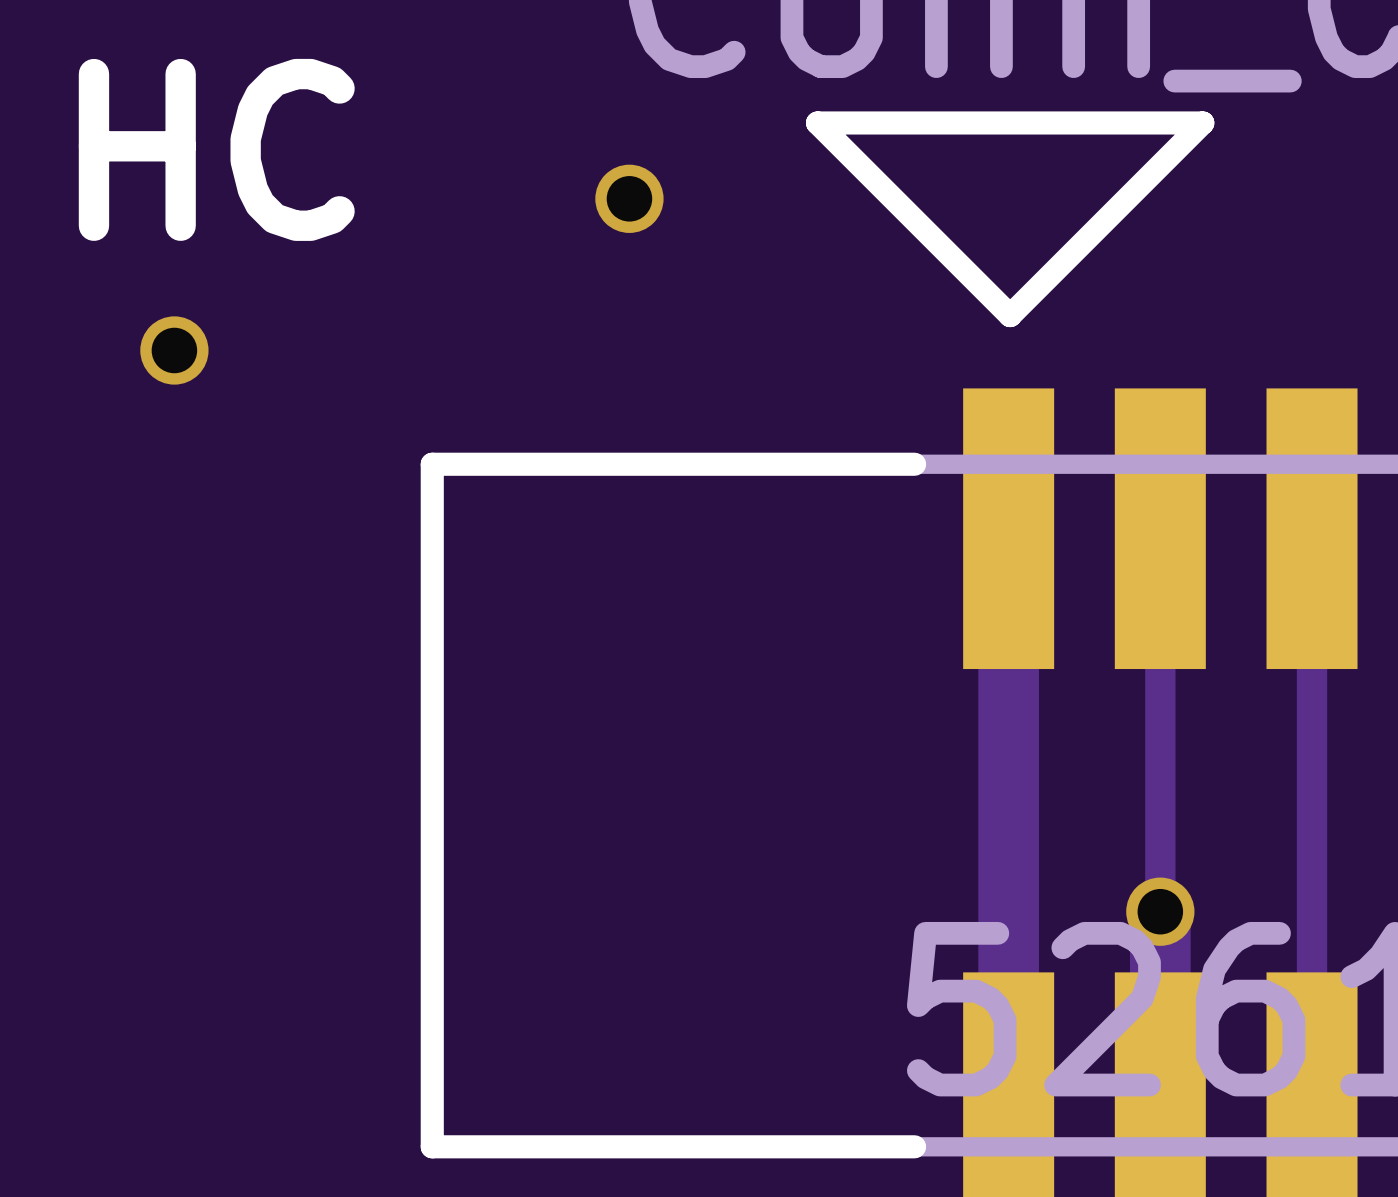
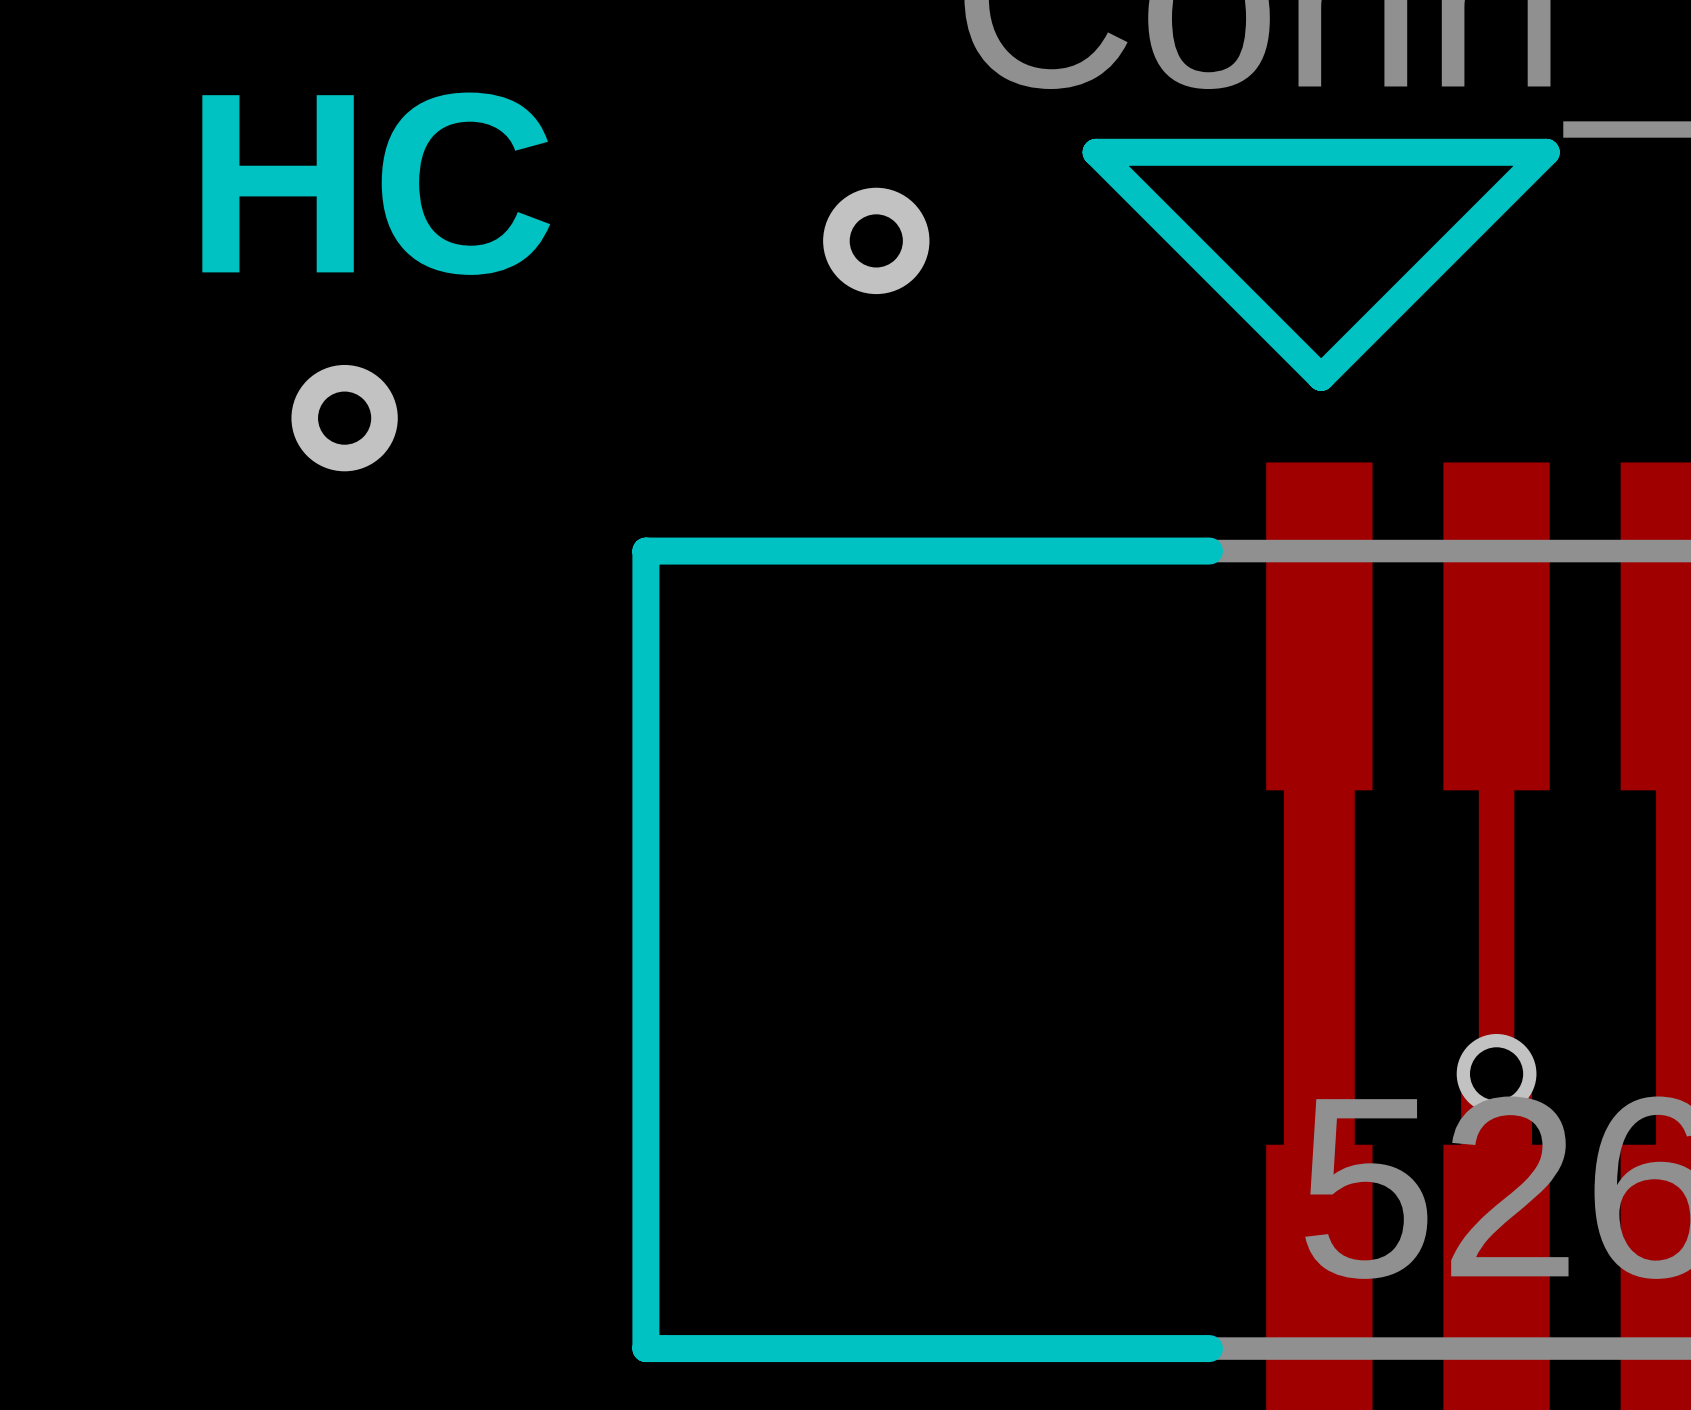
via size: [595, 164, 664, 233] -> [823, 187, 930, 295]
via size: [140, 316, 209, 385] -> [291, 364, 398, 472]

